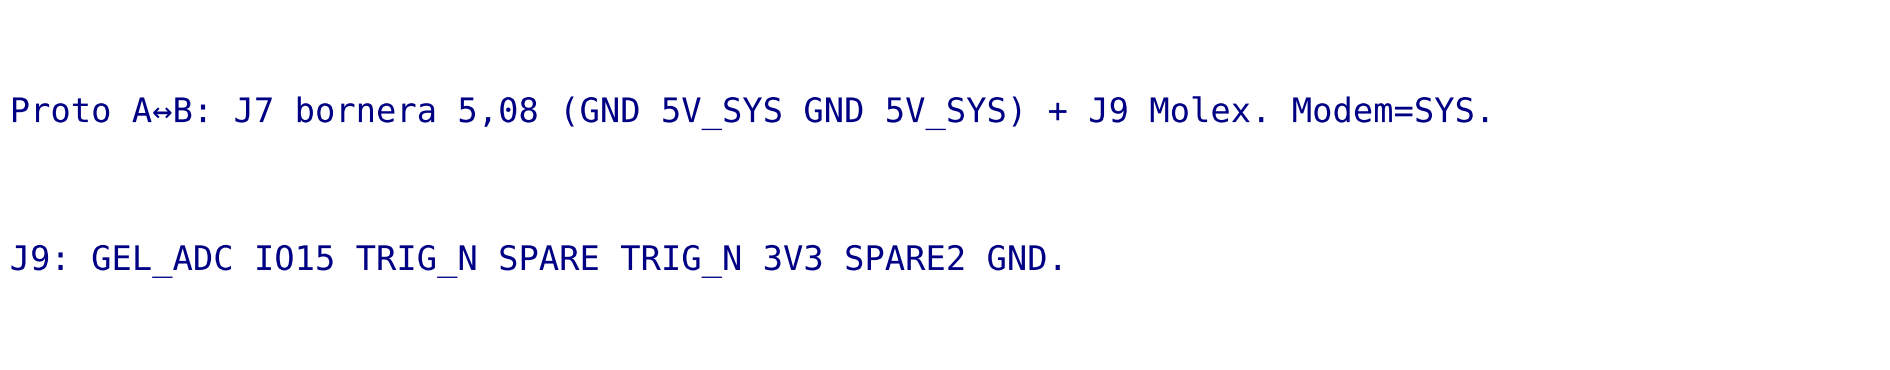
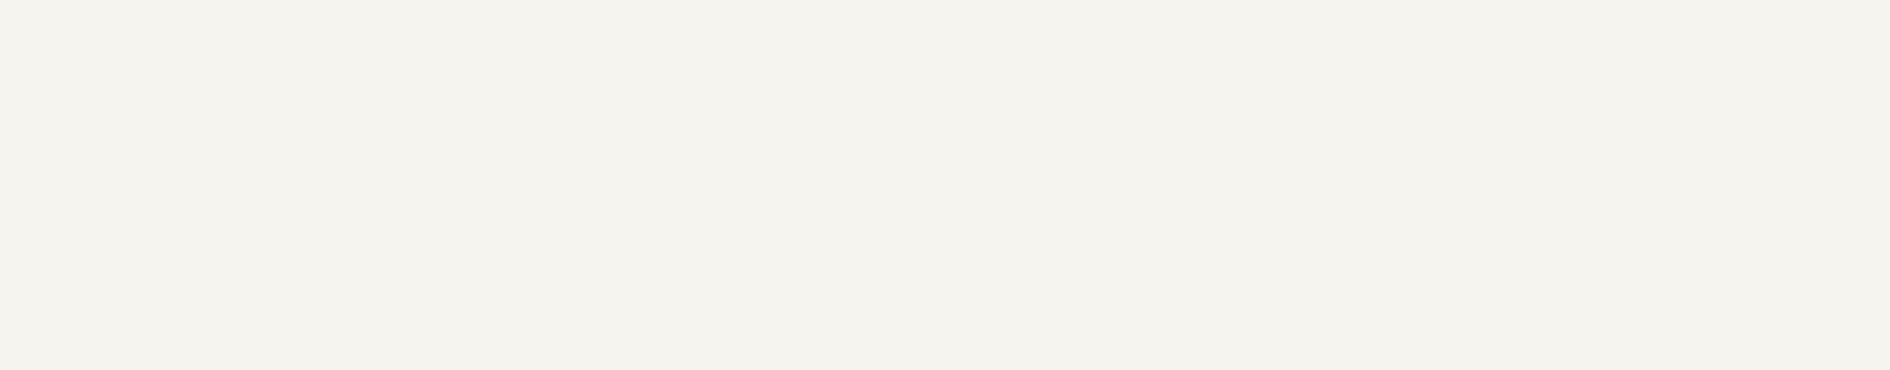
text: Proto A↔B: J7 bornera 5,08 (GND 5V_SYS GND 5V_SYS) + J9 Molex. Modem=SYS. (750, 113) -> none
text: J9: GEL_ADC IO15 TRIG_N SPARE TRIG_N 3V3 SPARE2 GND. (535, 261) -> none

